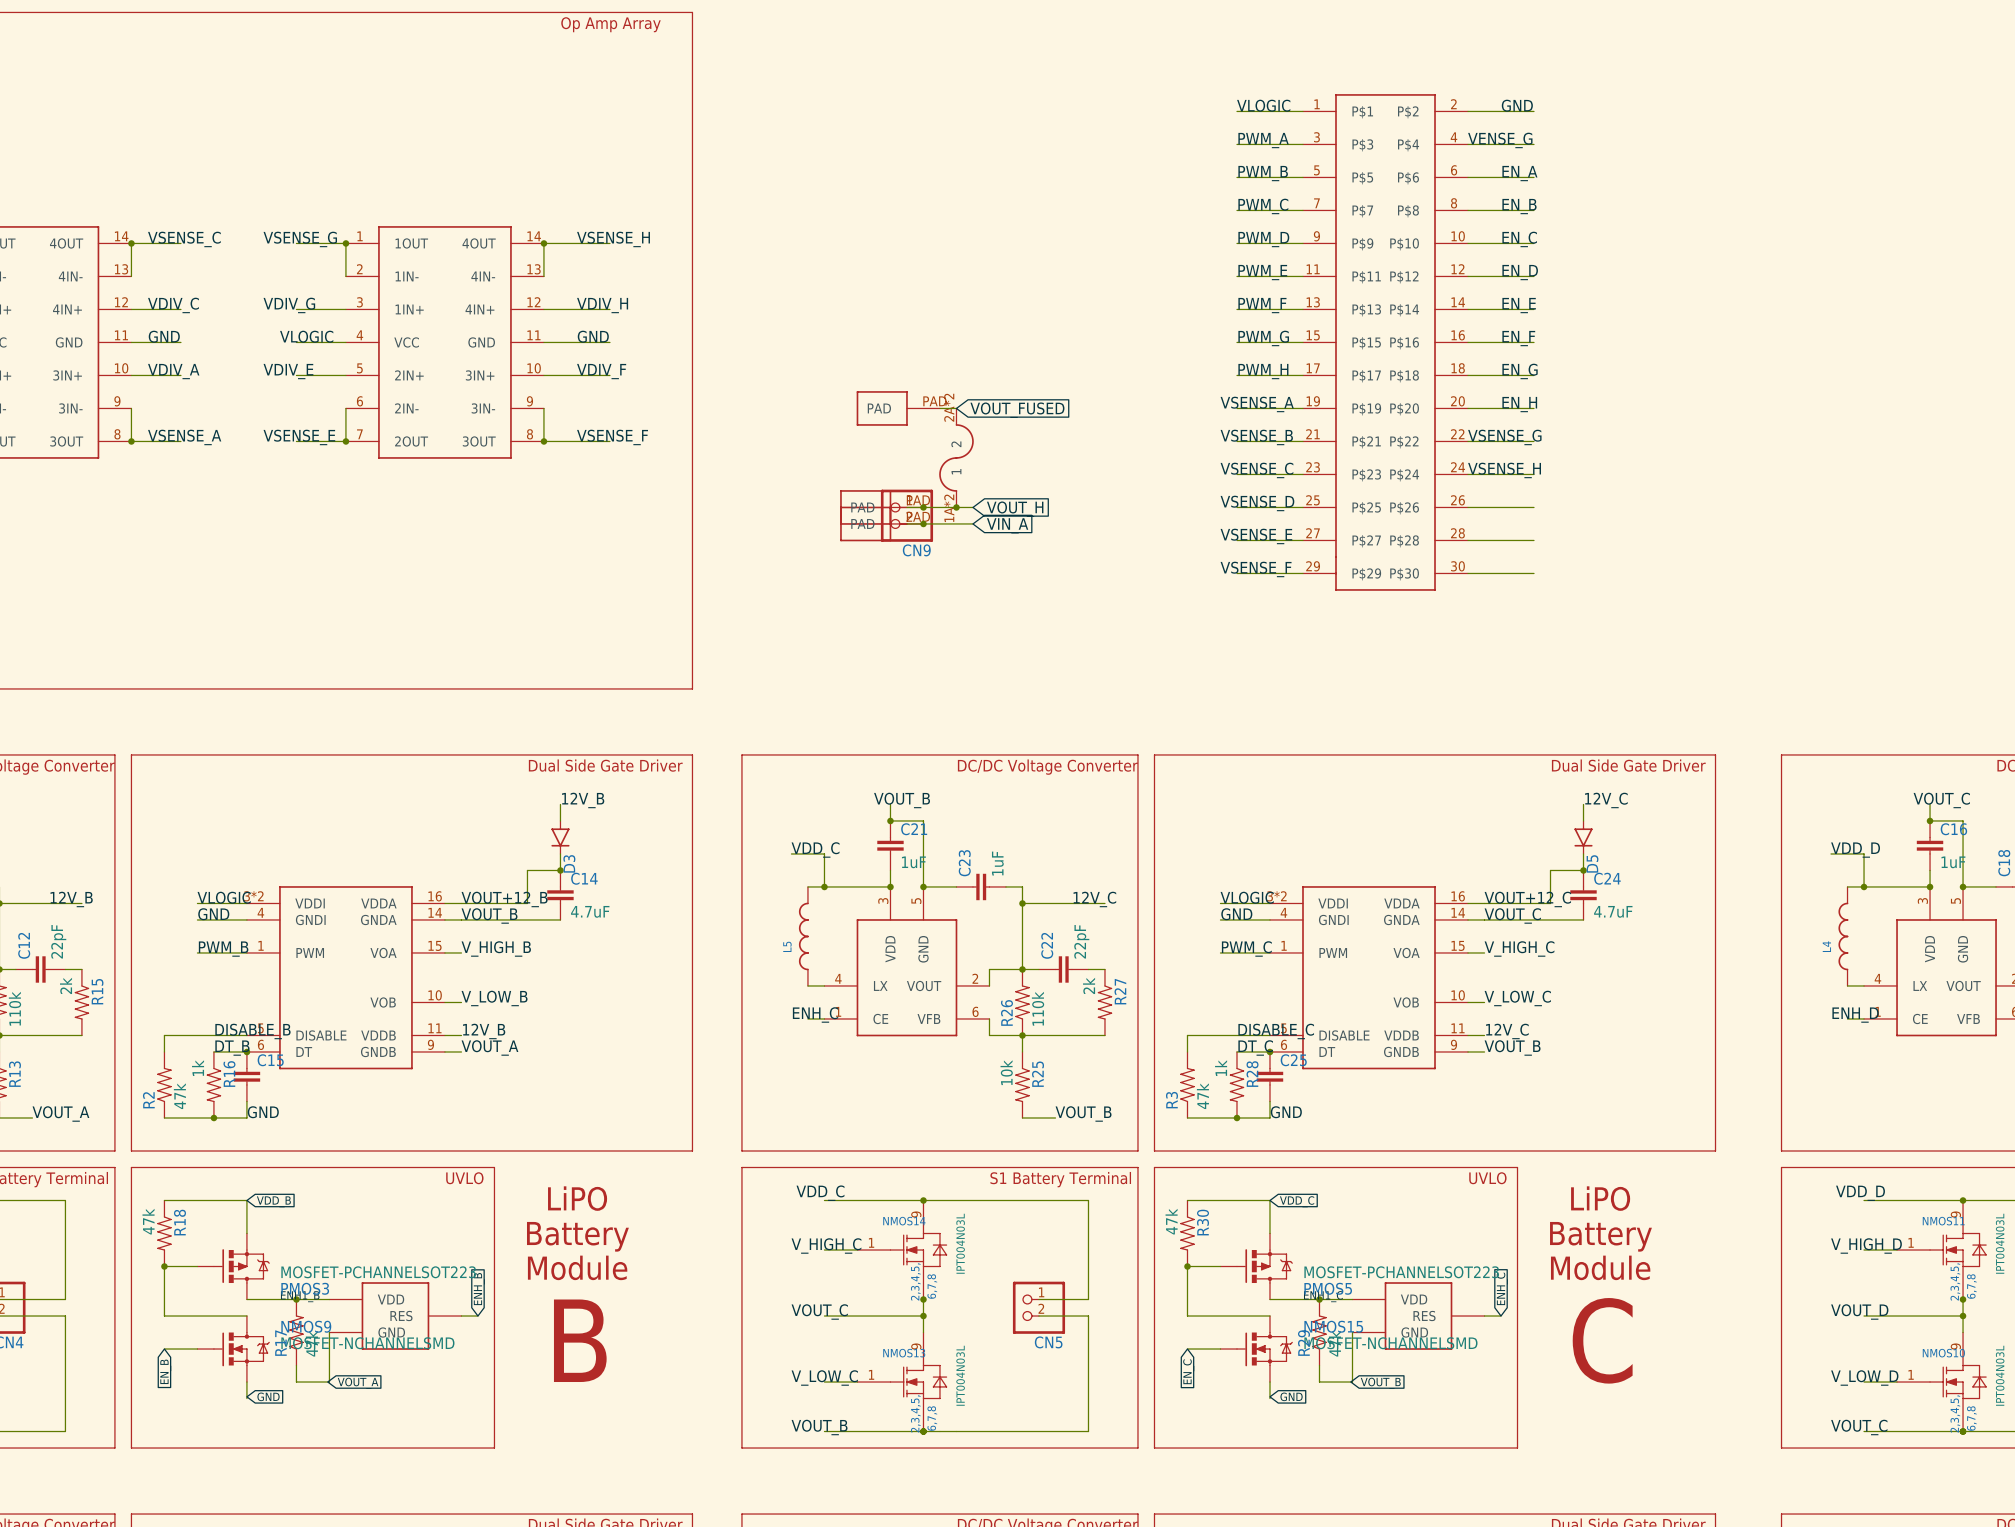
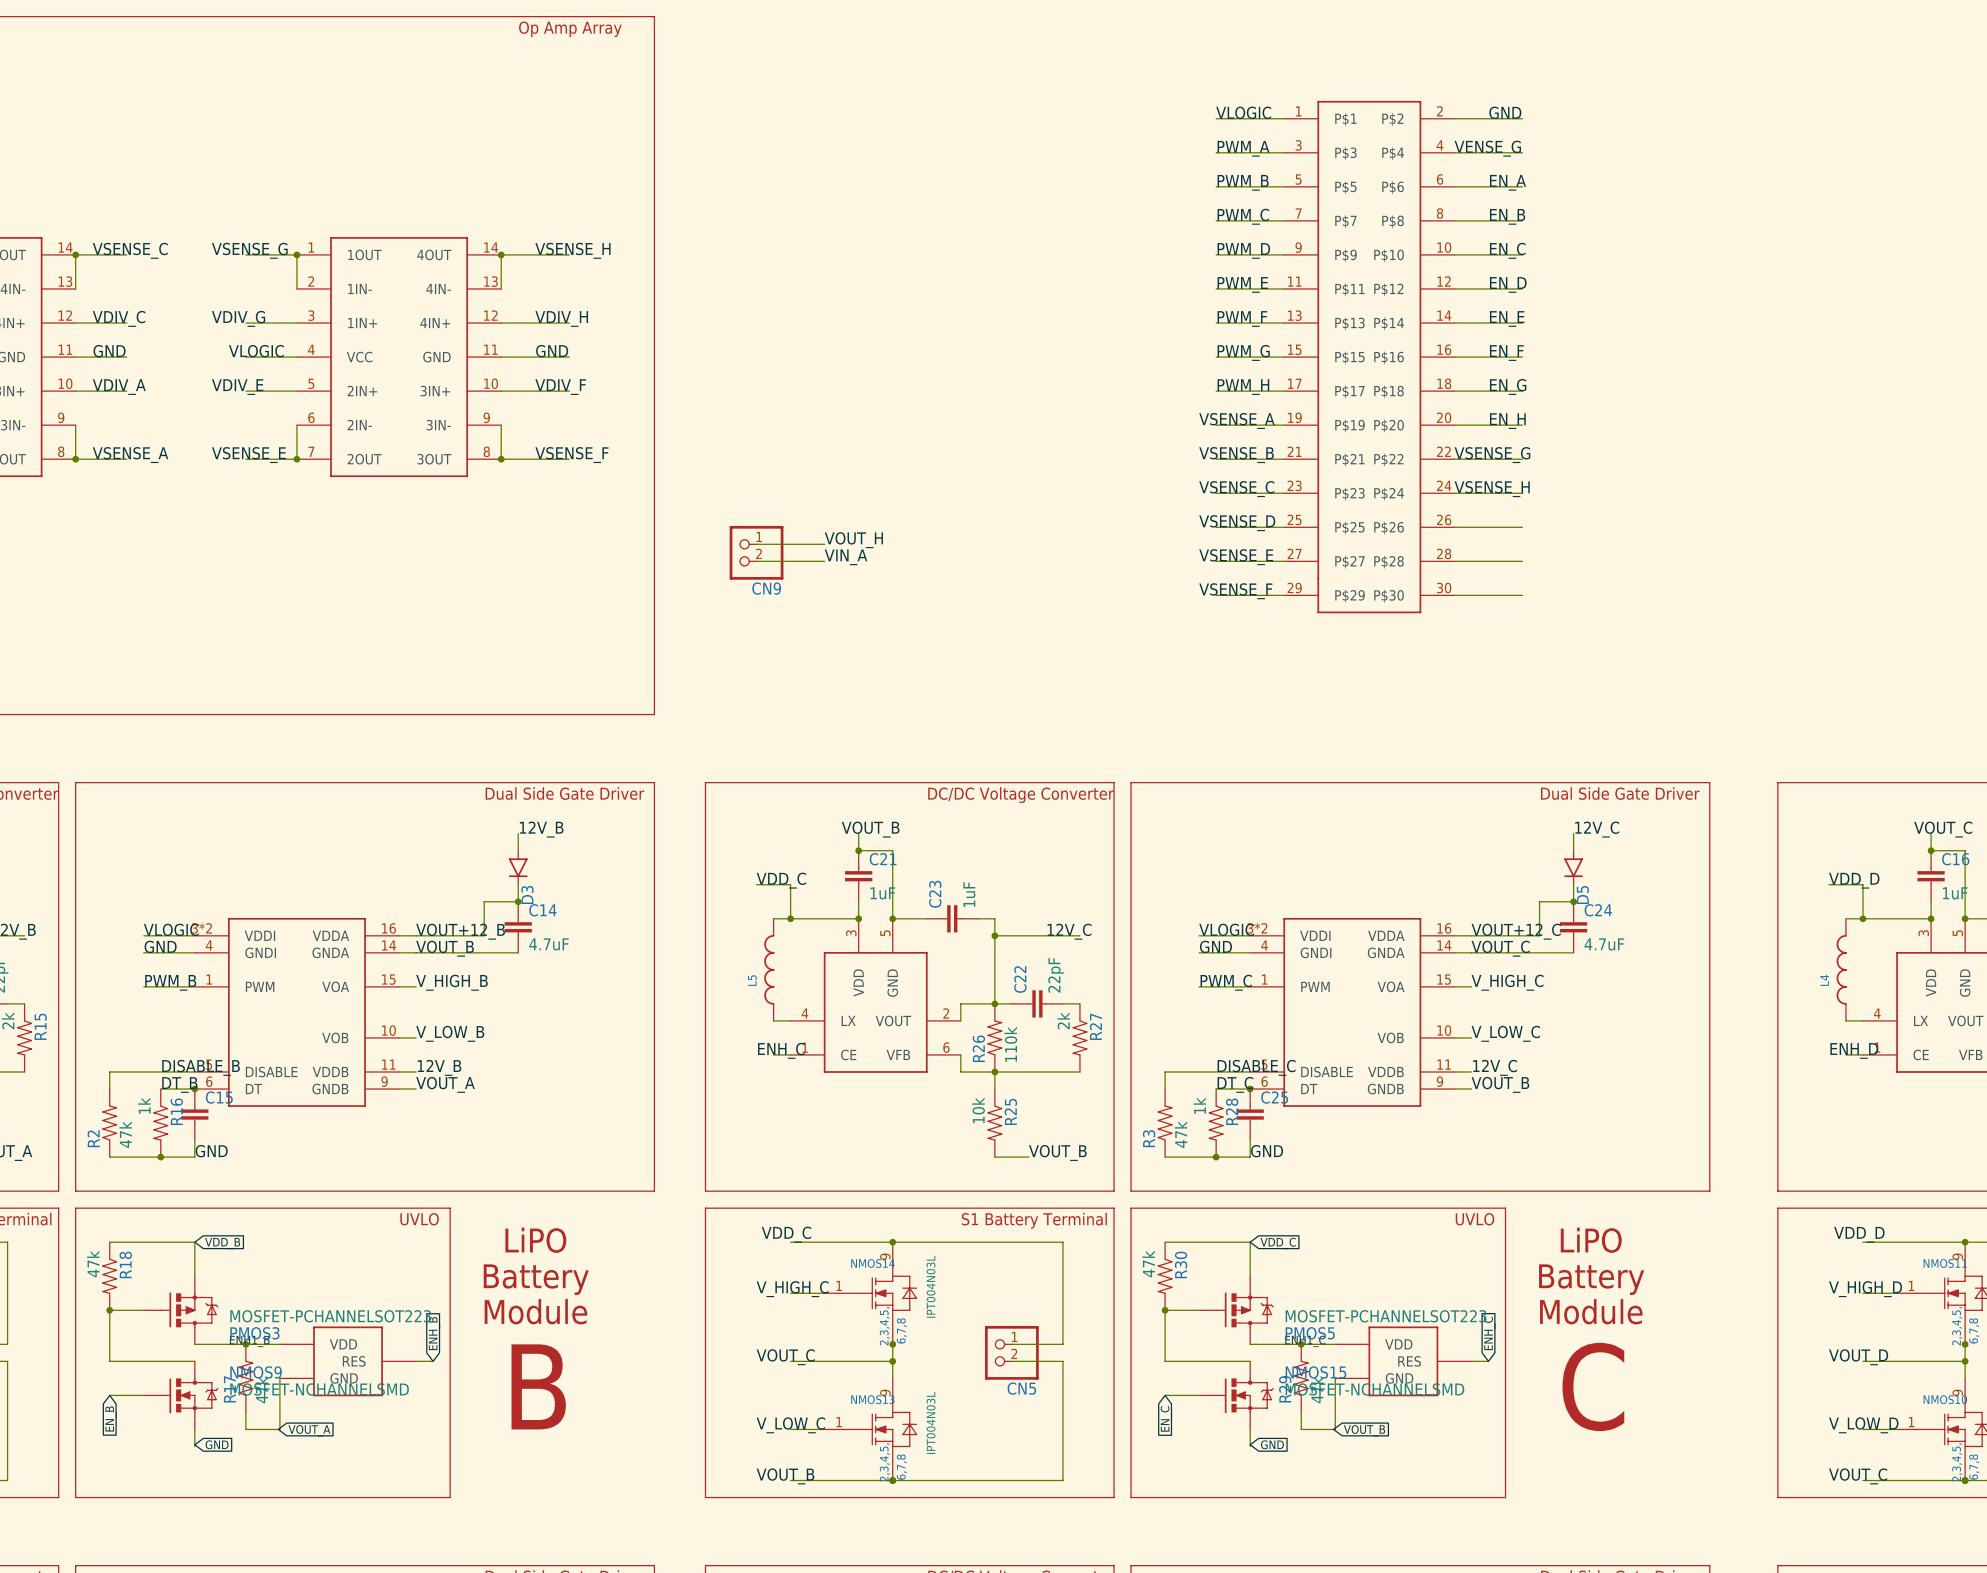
part: (898, 408) -> none
wire: (939, 408) (956, 408) -> none
global label: VOUT_FUSED (1017, 410) -> none
part: (956, 457) -> none
part: (881, 507) -> none
wire: (906, 507) (972, 507) -> (756, 544) (824, 544)
junction: (923, 507) -> none
junction: (956, 507) -> none
global label: VOUT_H (1015, 509) -> none
CN9 position: (906, 515) -> (756, 552)
label: none -> VOUT_H (853, 540)
part: (881, 523) -> none
wire: (906, 523) (972, 523) -> (756, 561) (824, 561)
junction: (923, 523) -> none
global label: VIN_A (1007, 525) -> none
label: none -> VIN_A (846, 557)

